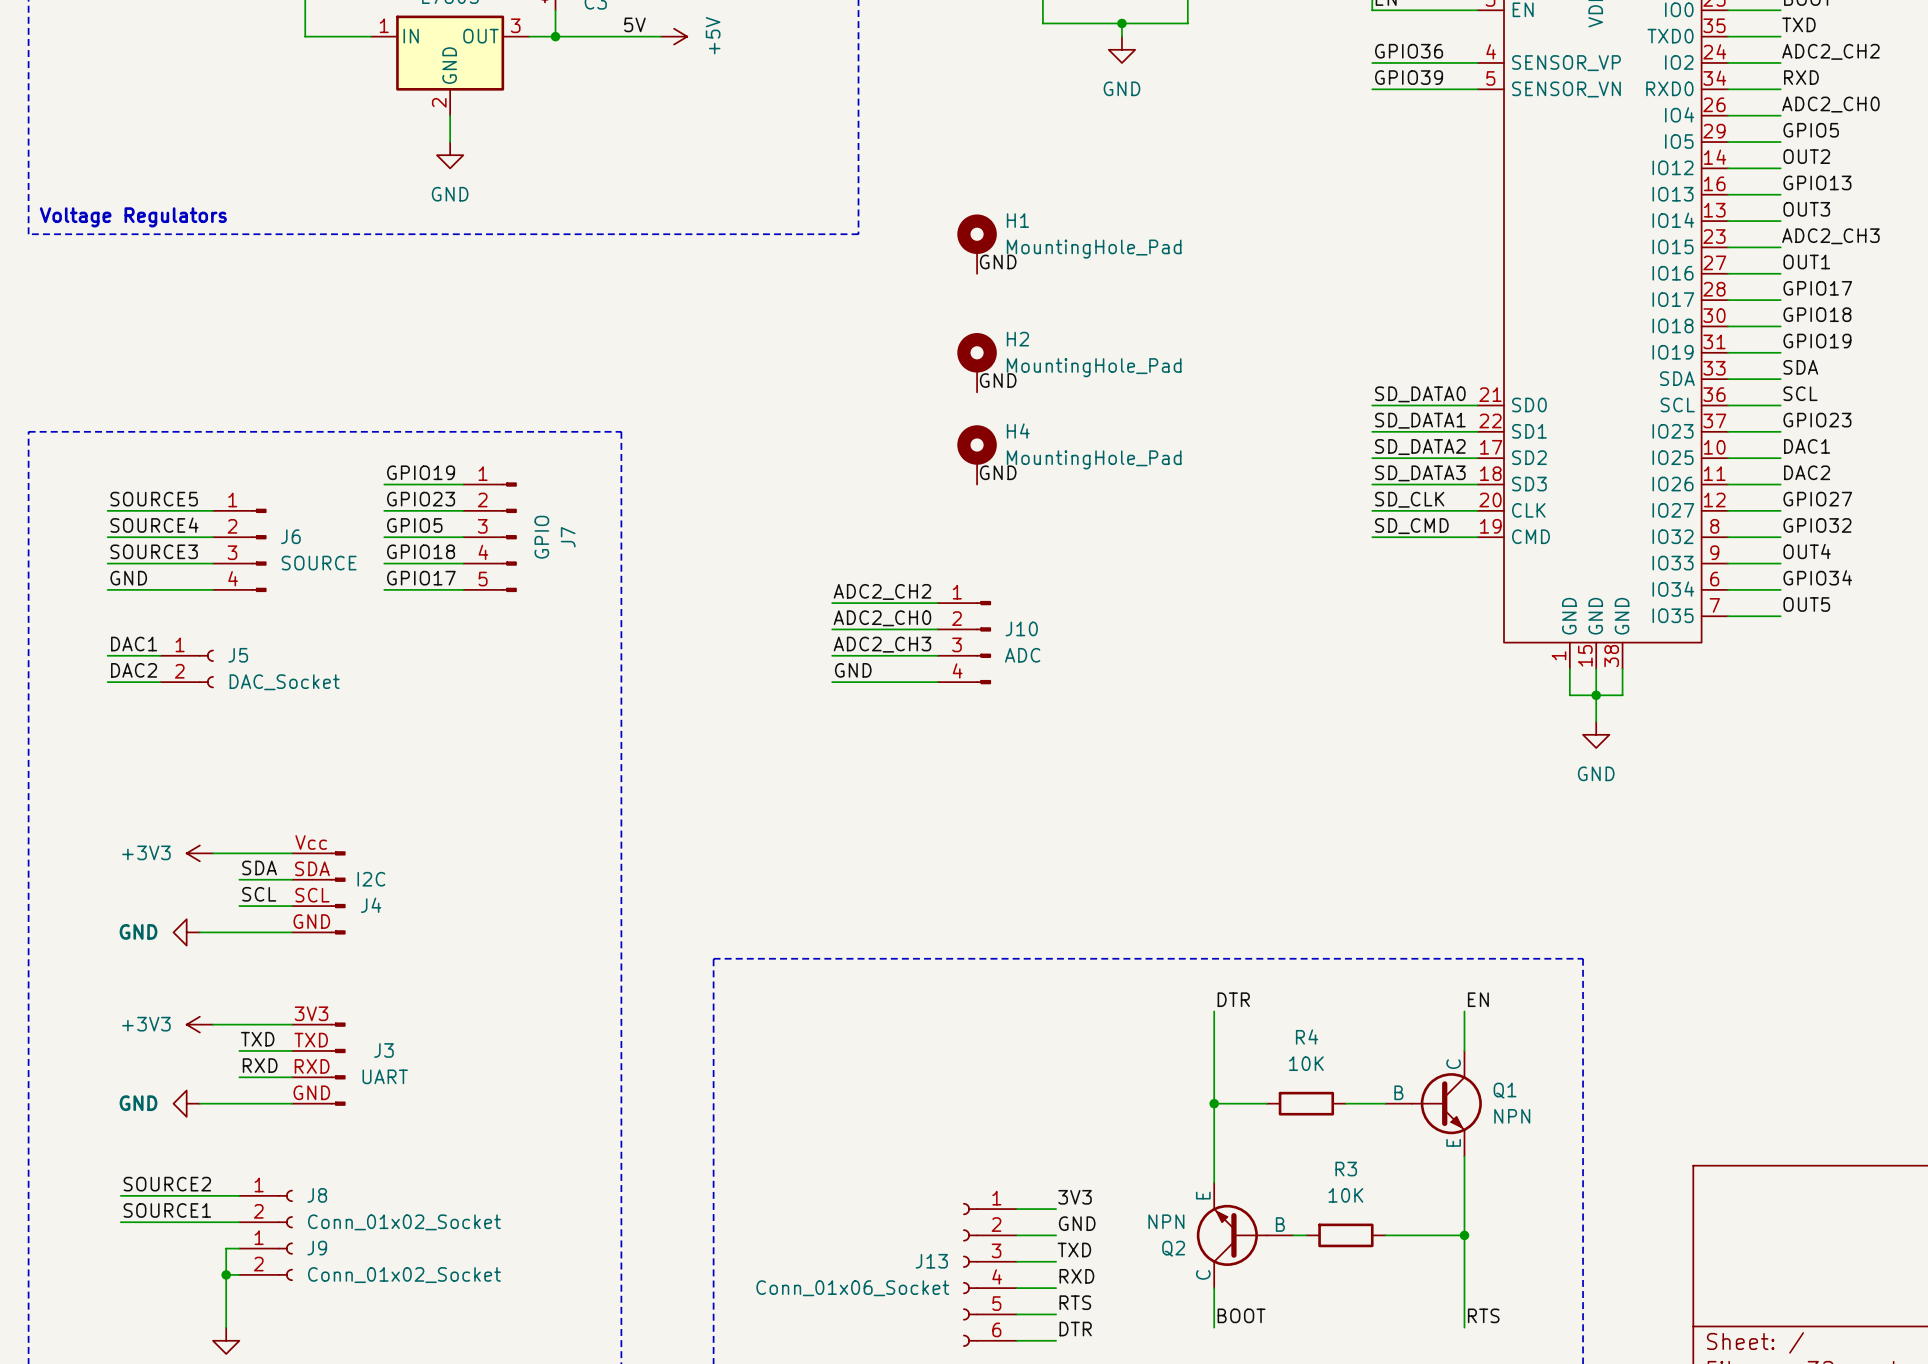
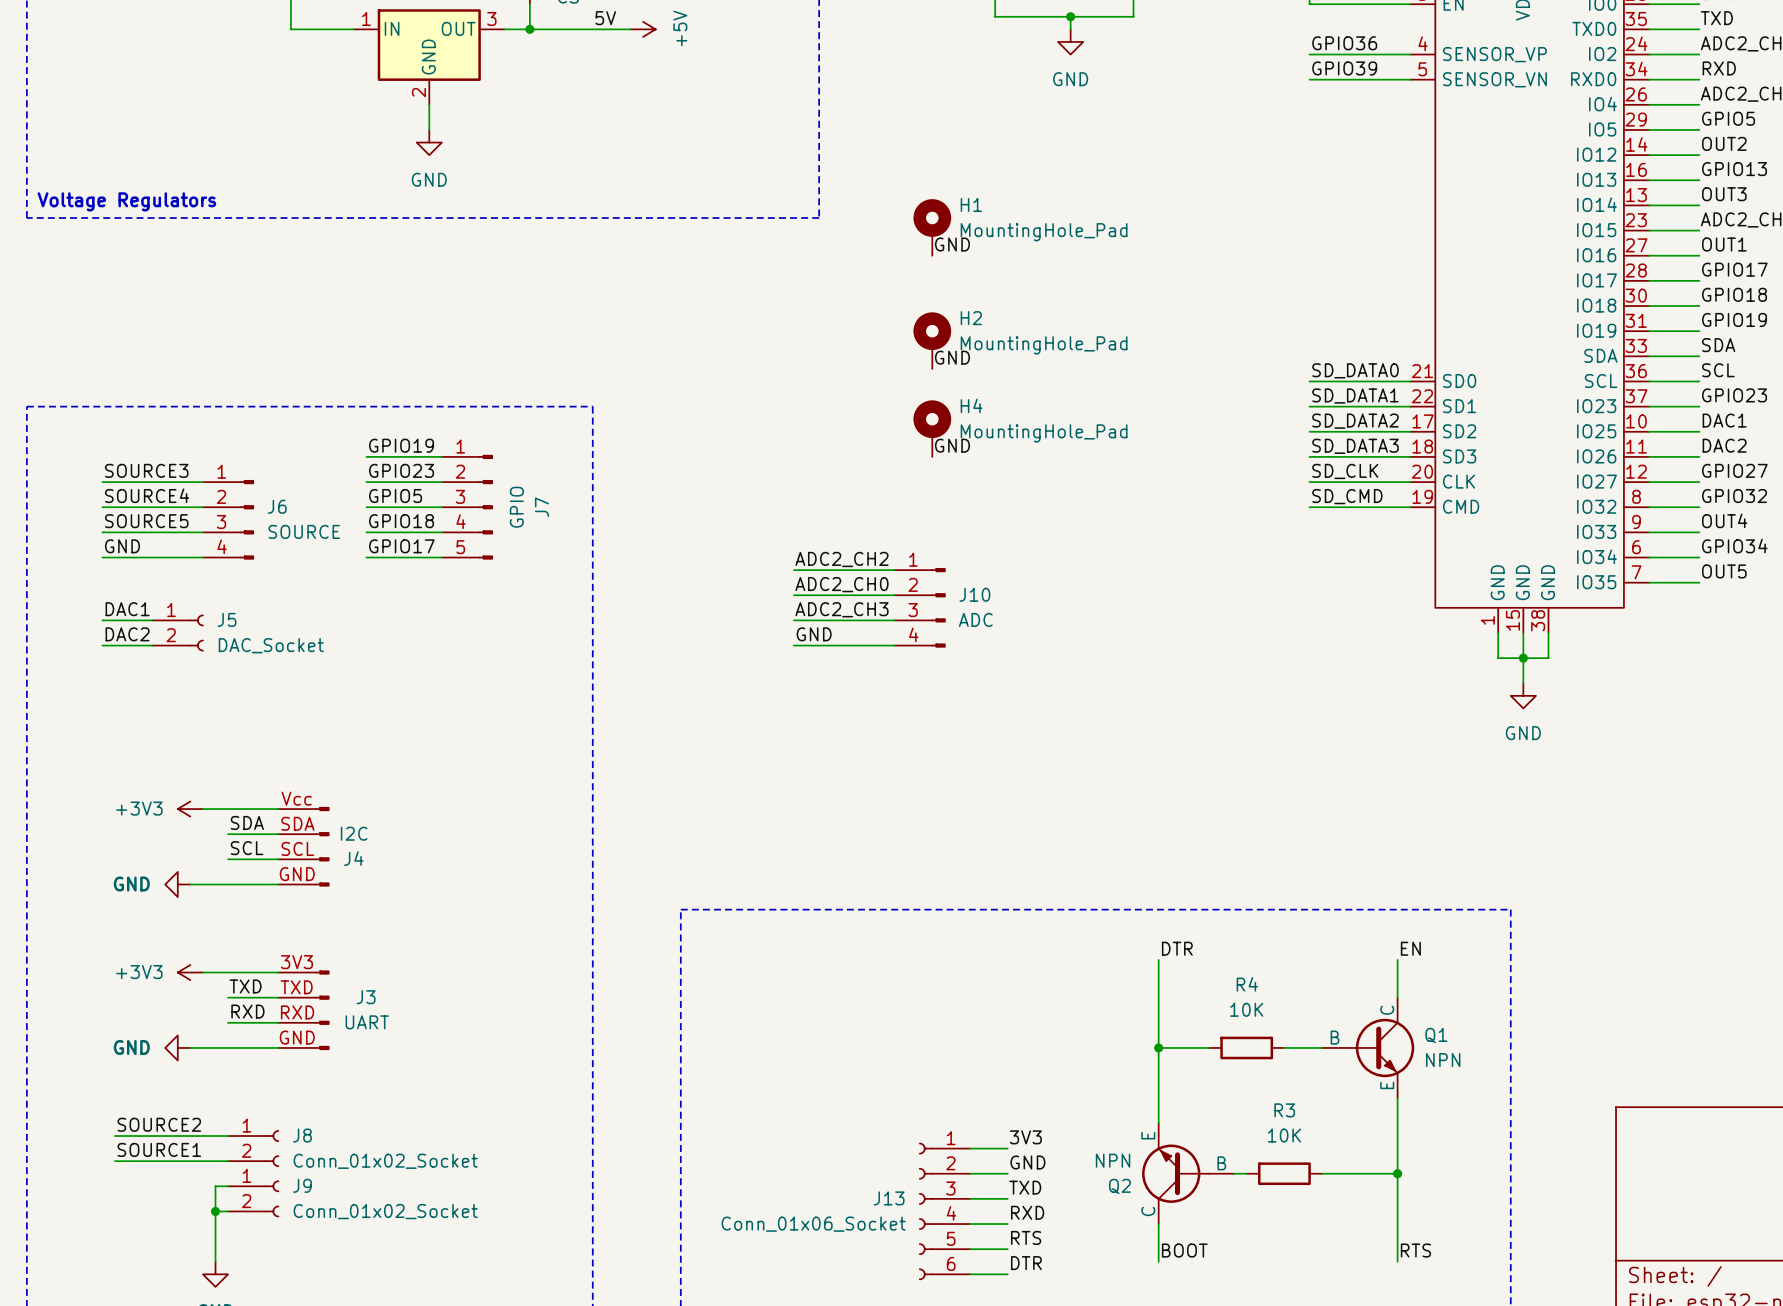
label: SOURCE5 (154, 499) -> SOURCE3 (146, 470)
label: SOURCE3 (154, 551) -> SOURCE5 (146, 521)

